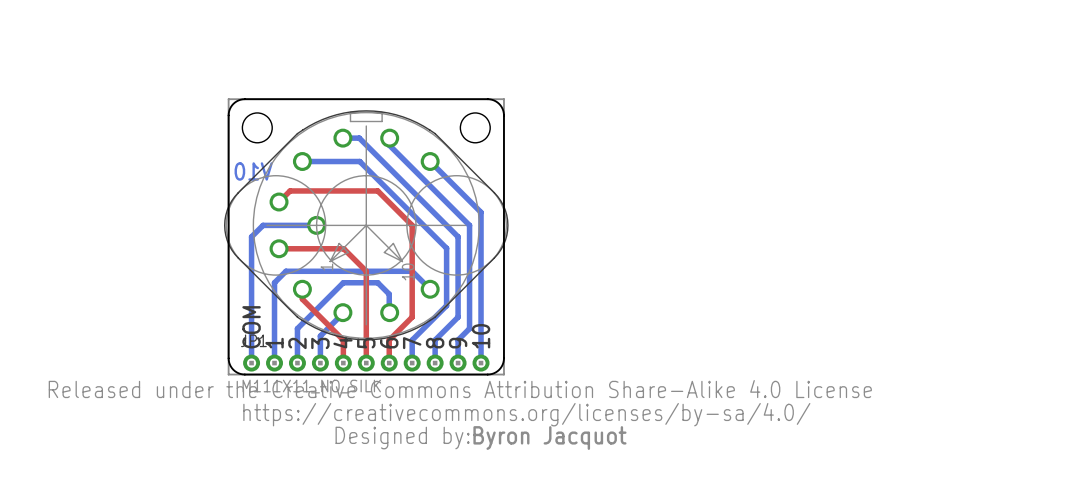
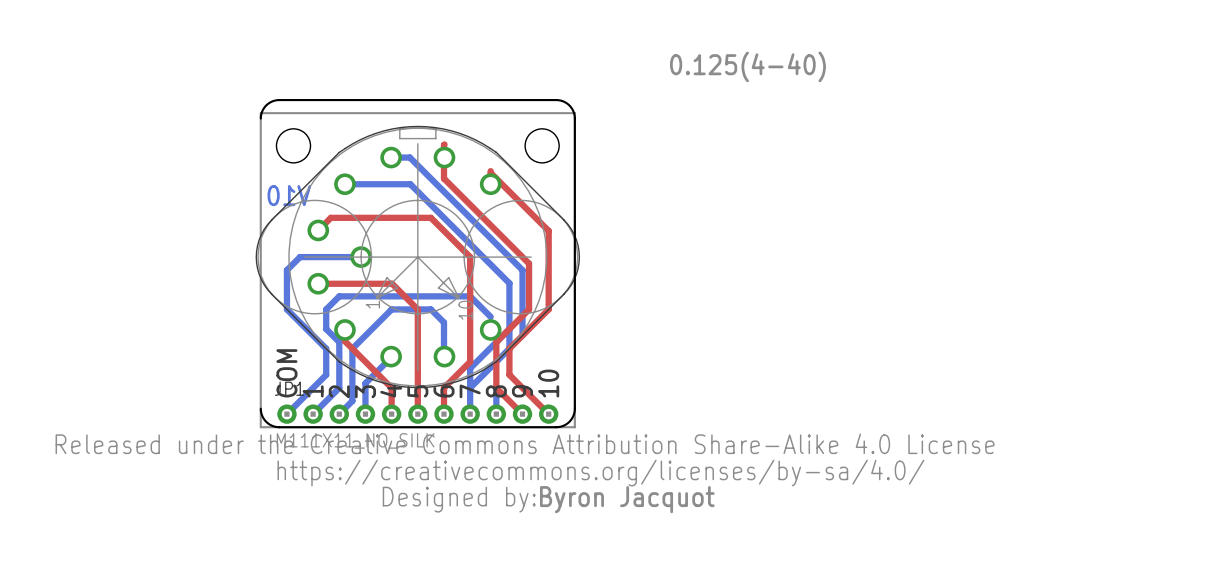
text: none -> 0.125(4-40) (747, 66)
board edge: (503, 115) (499, 103) (487, 99) (244, 99) (233, 103) (228, 115) (228, 358) -> (574, 131) (574, 116) (572, 109) (565, 102) (556, 100) (279, 100) (266, 105) (260, 118)
top track: none -> (444, 144) (443, 178) (529, 263) (529, 309) (496, 342) (496, 387) (522, 414)
bottom track: (389, 138) (389, 145) (469, 225) (469, 328) (458, 340) (458, 363) -> none
top track: none -> (490, 171) (548, 230) (548, 309) (509, 348) (509, 374) (548, 414)
bottom track: (430, 161) (481, 212) (481, 363) -> none
bottom track: (251, 271) (251, 363) -> (286, 309) (326, 348) (326, 374) (286, 414)
bottom track: (343, 271) (285, 271) (274, 282) (274, 363) -> (391, 309) (352, 348) (352, 401) (339, 414)
bottom track: (377, 271) (412, 271) (430, 289) -> (430, 309) (443, 322) (443, 335)
bottom track: none -> (509, 329) (470, 368) (470, 387)
bottom track: (389, 294) (377, 282) (343, 282) (297, 328) -> (490, 316) (470, 296) (339, 296) (326, 309) (326, 329) (339, 342) (339, 374)
bottom track: (458, 294) (458, 317) (435, 340) -> none
bottom track: (297, 340) (297, 363) -> (339, 387) (313, 414)

